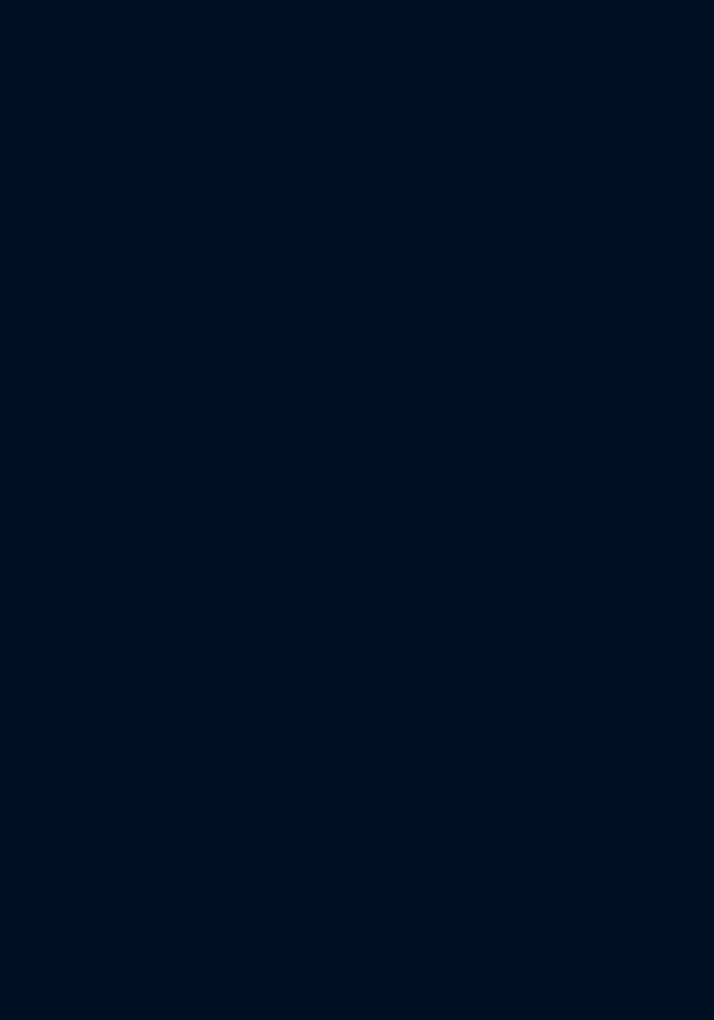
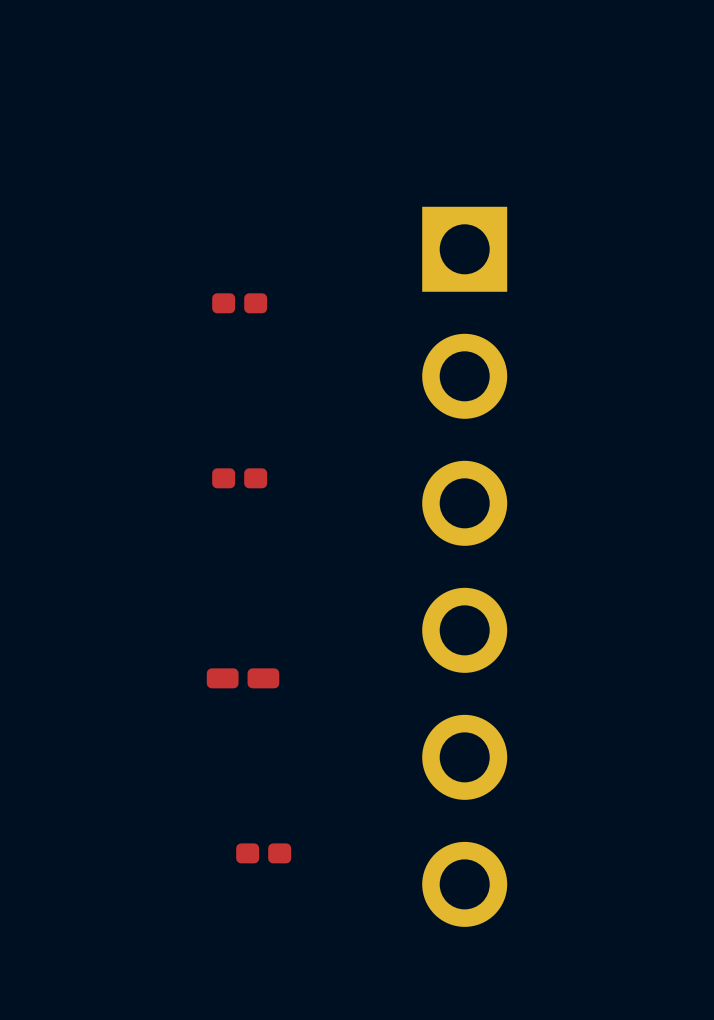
part: none -> (239, 303)
part: none -> (239, 478)
part: none -> (464, 566)
part: none -> (243, 678)
part: none -> (263, 853)

